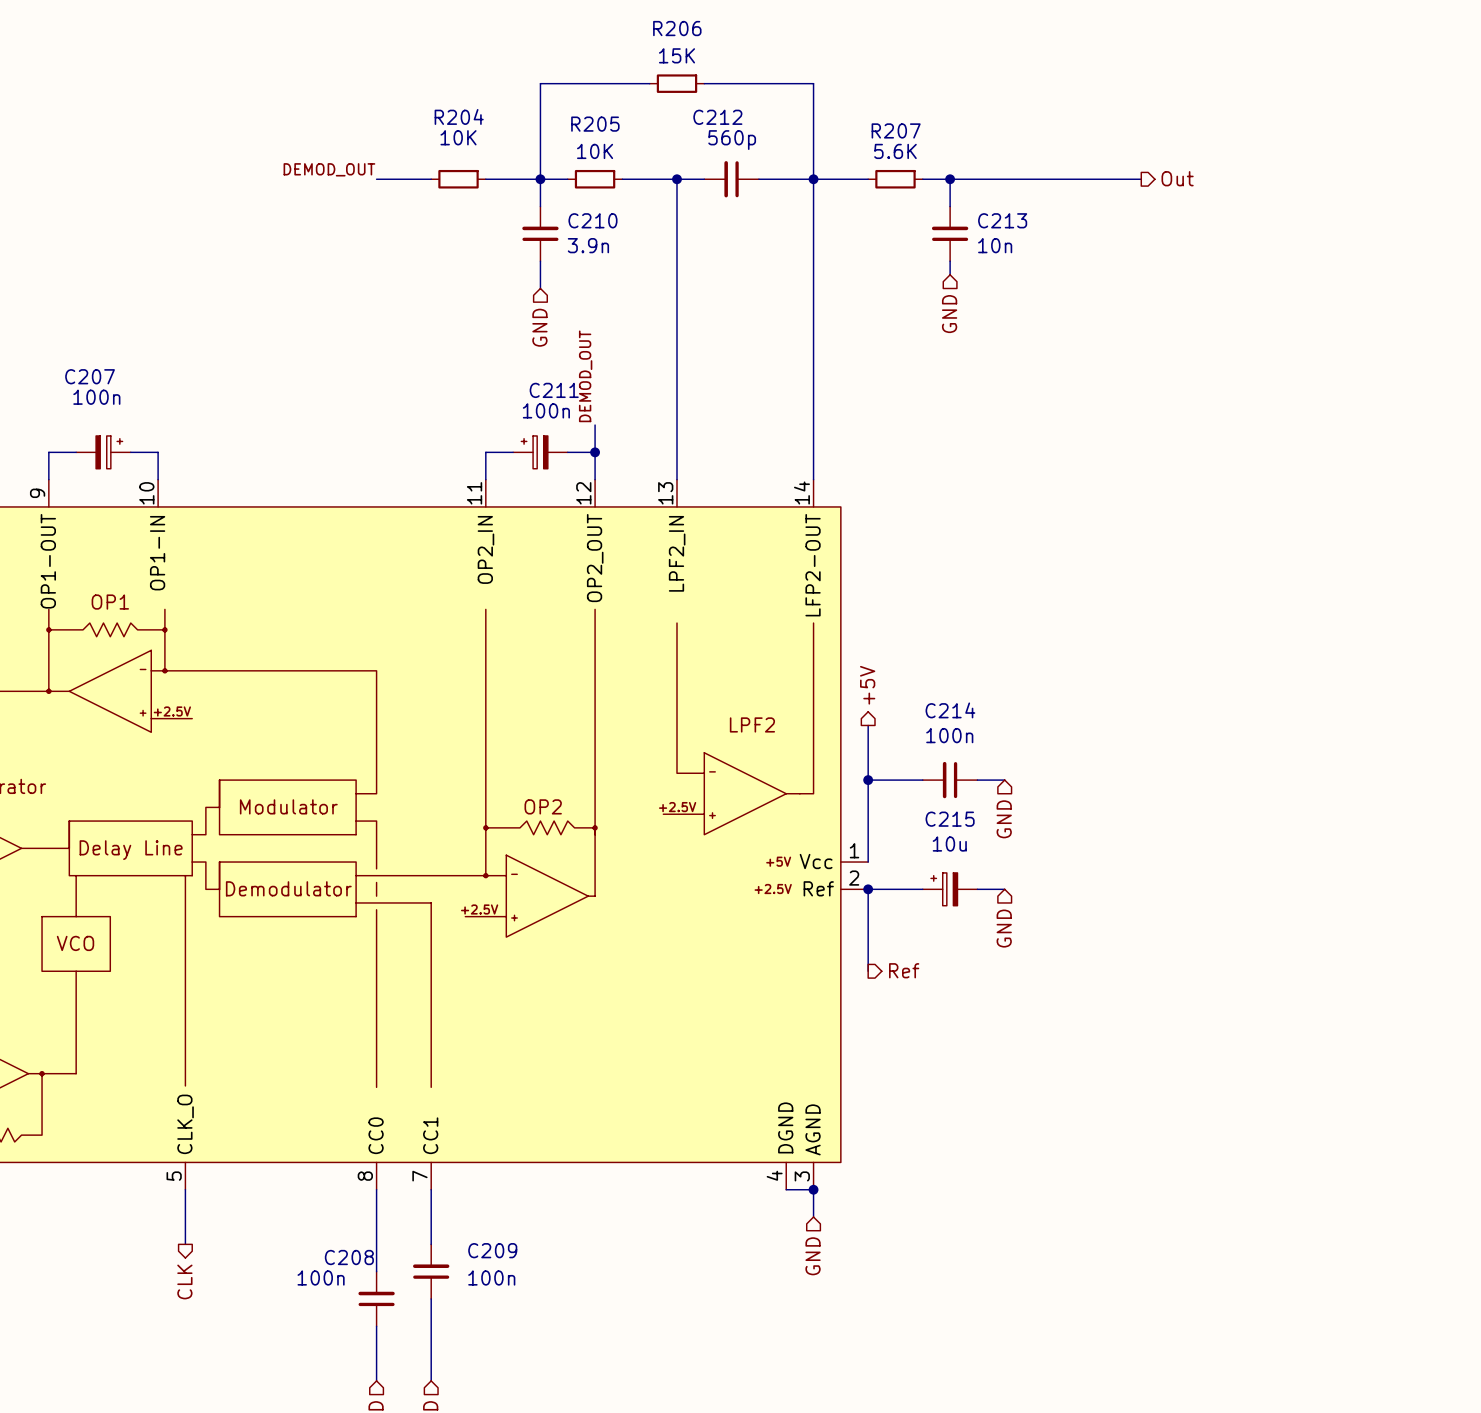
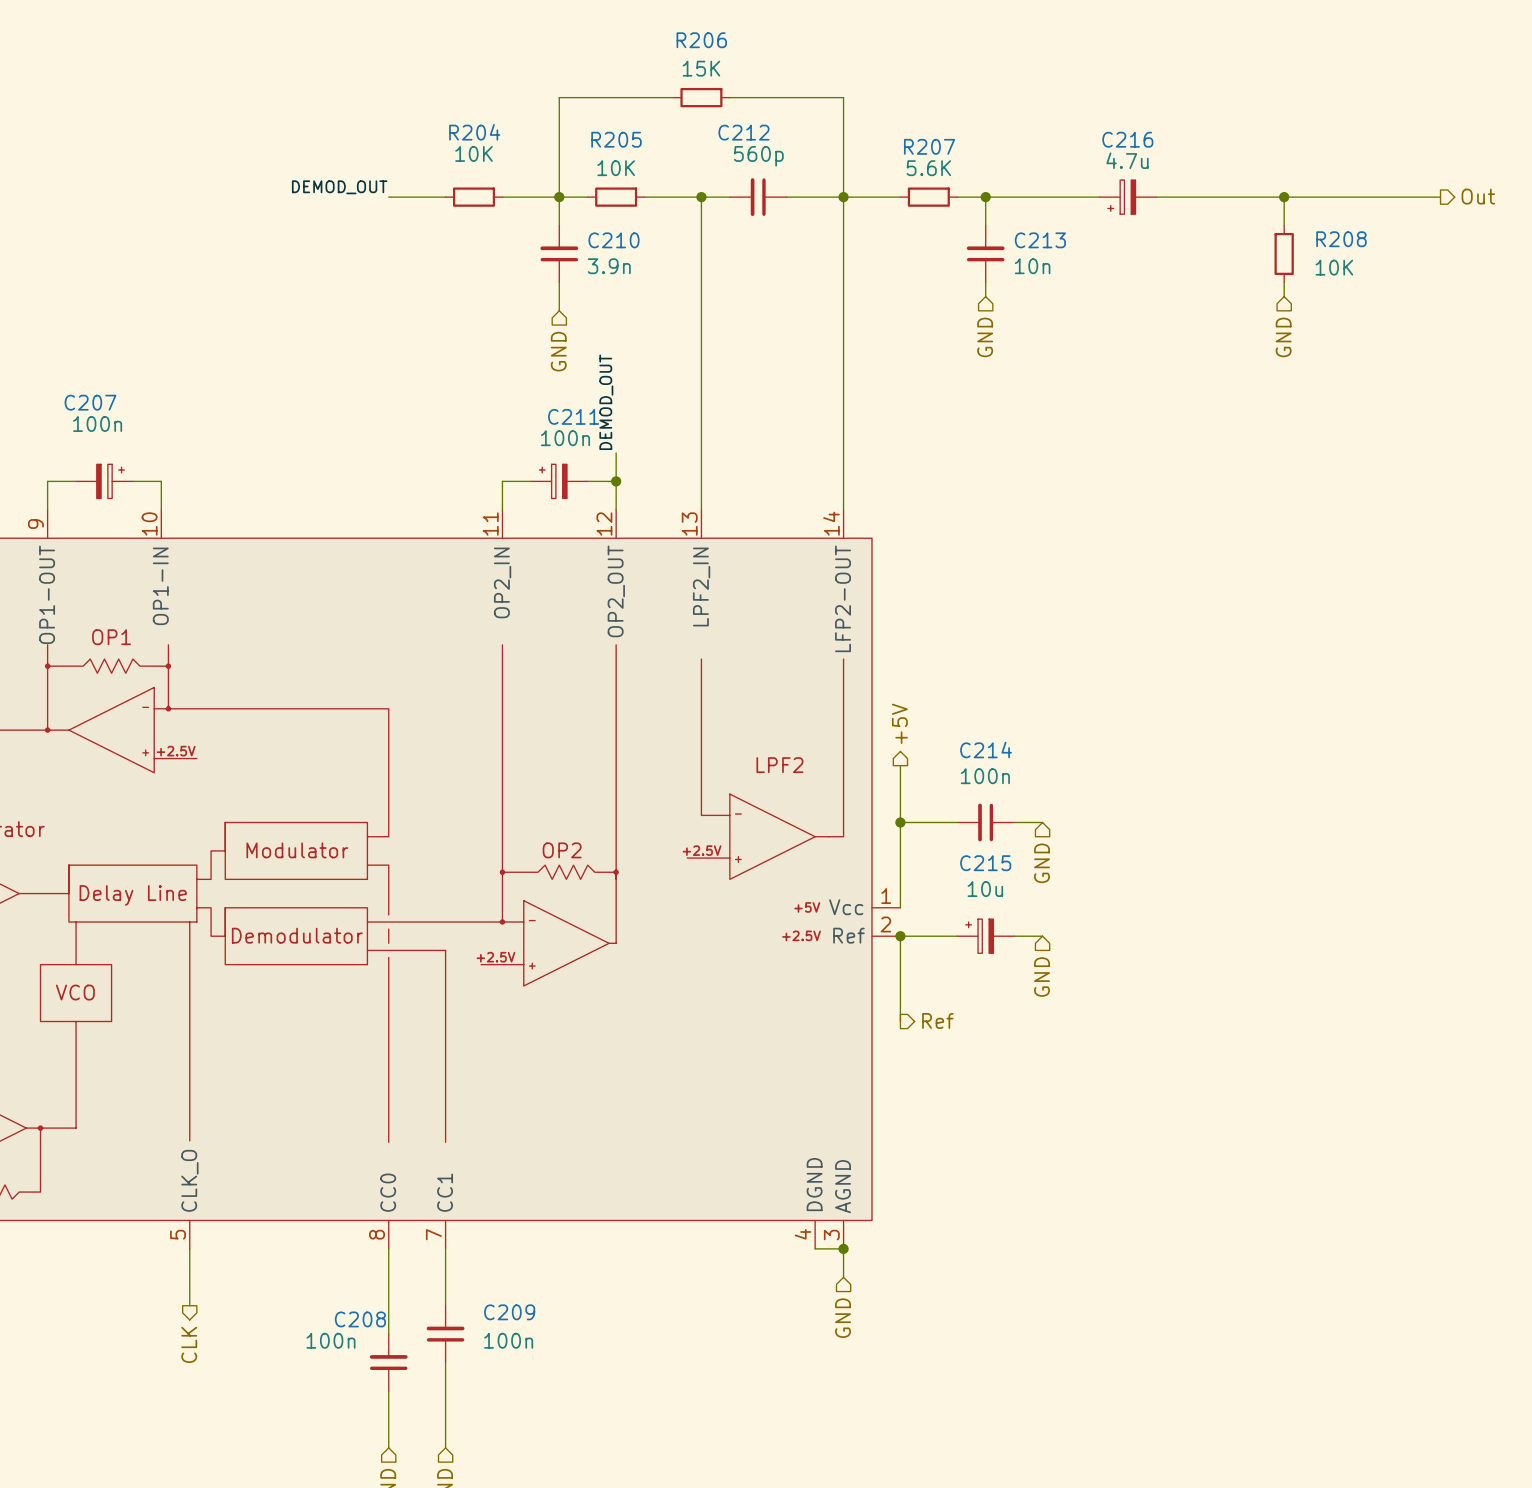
hierarchical label position: Out (1177, 178) -> Out (1478, 196)
C216: none -> 4.7u (1127, 197)
wire: none -> (1184, 197) (1440, 197)
wire: none -> (1284, 197) (1284, 225)
junction: none -> (1284, 197)
R208: none -> 10K (1284, 253)
wire: none -> (1284, 282) (1284, 296)
hierarchical label: none -> GND (1283, 337)

